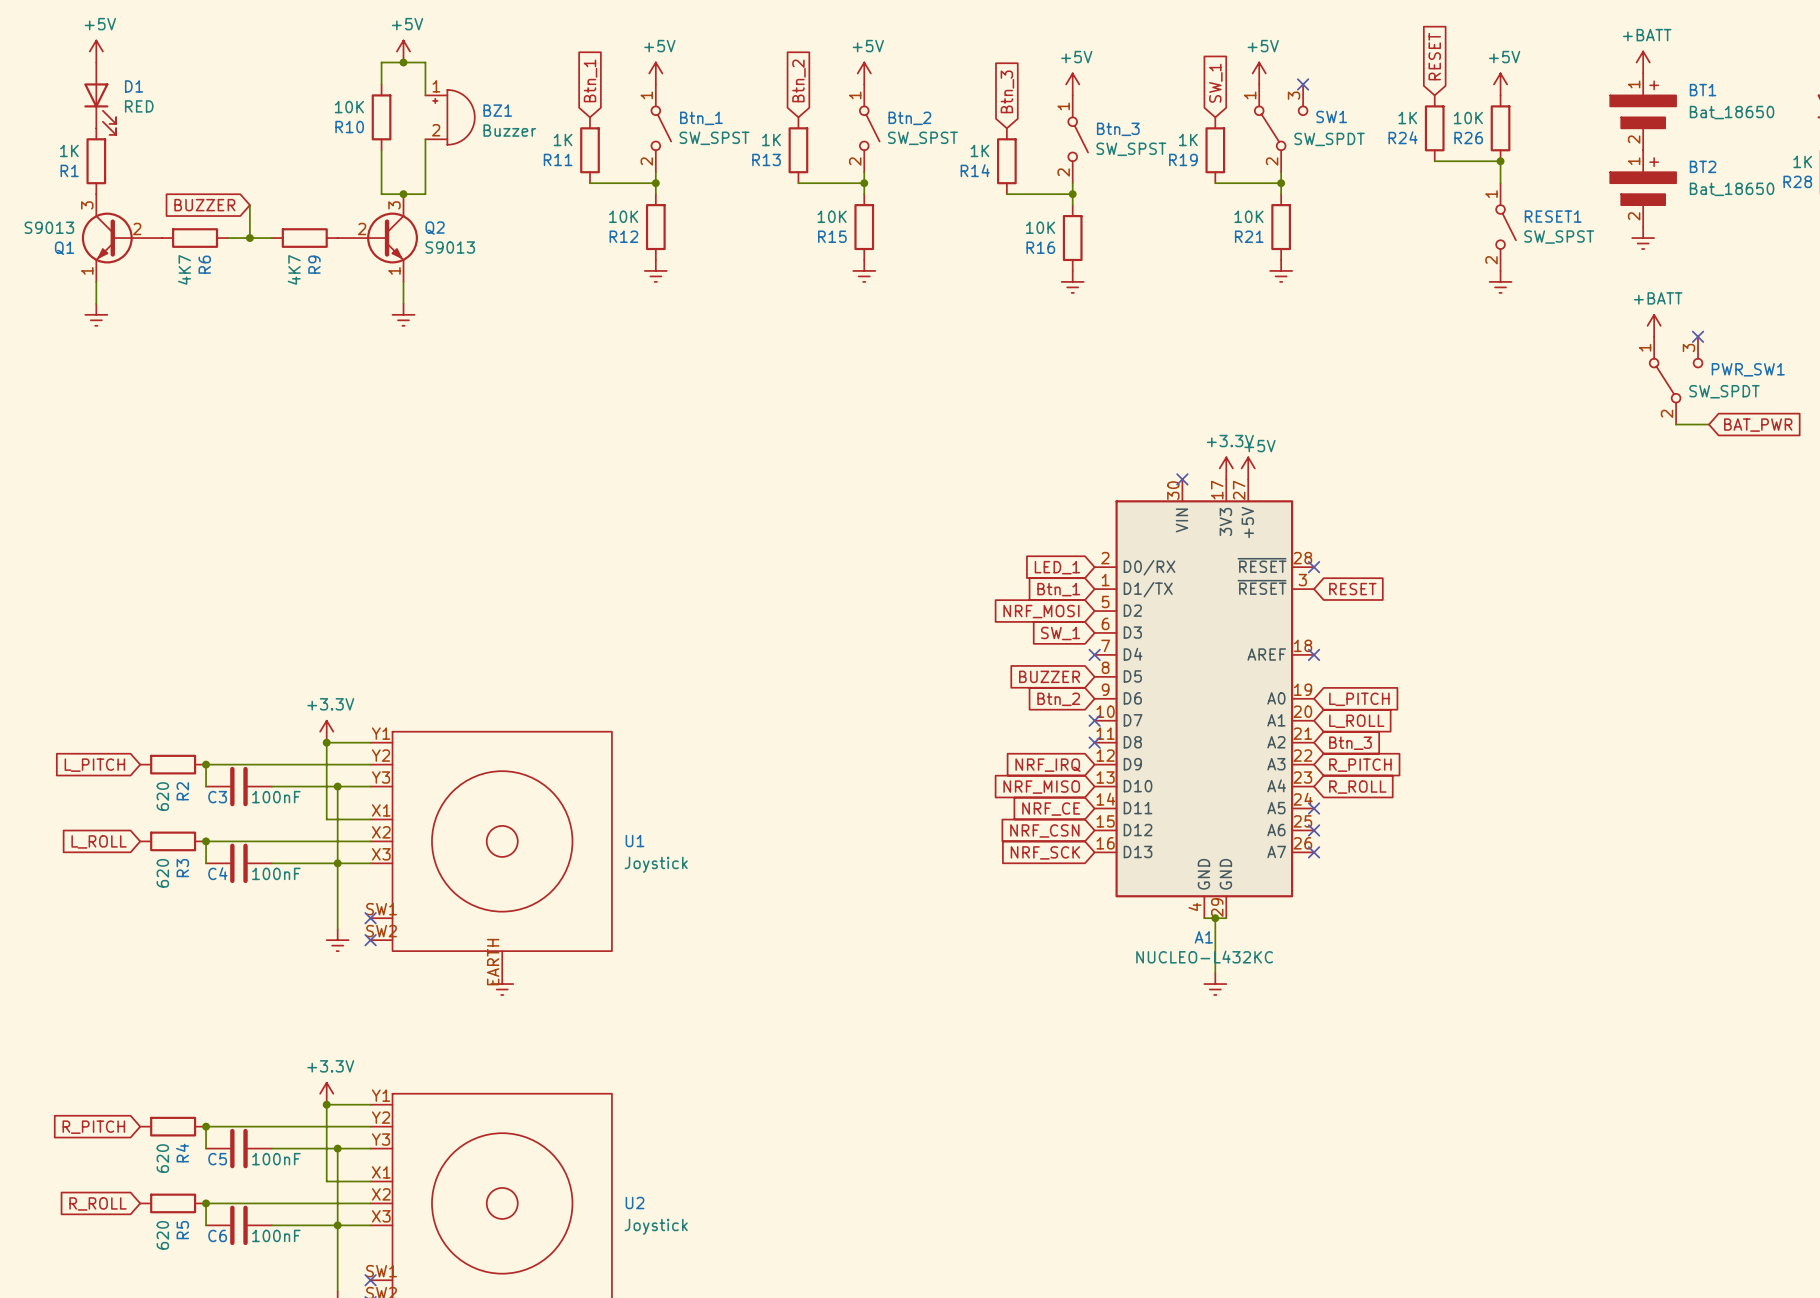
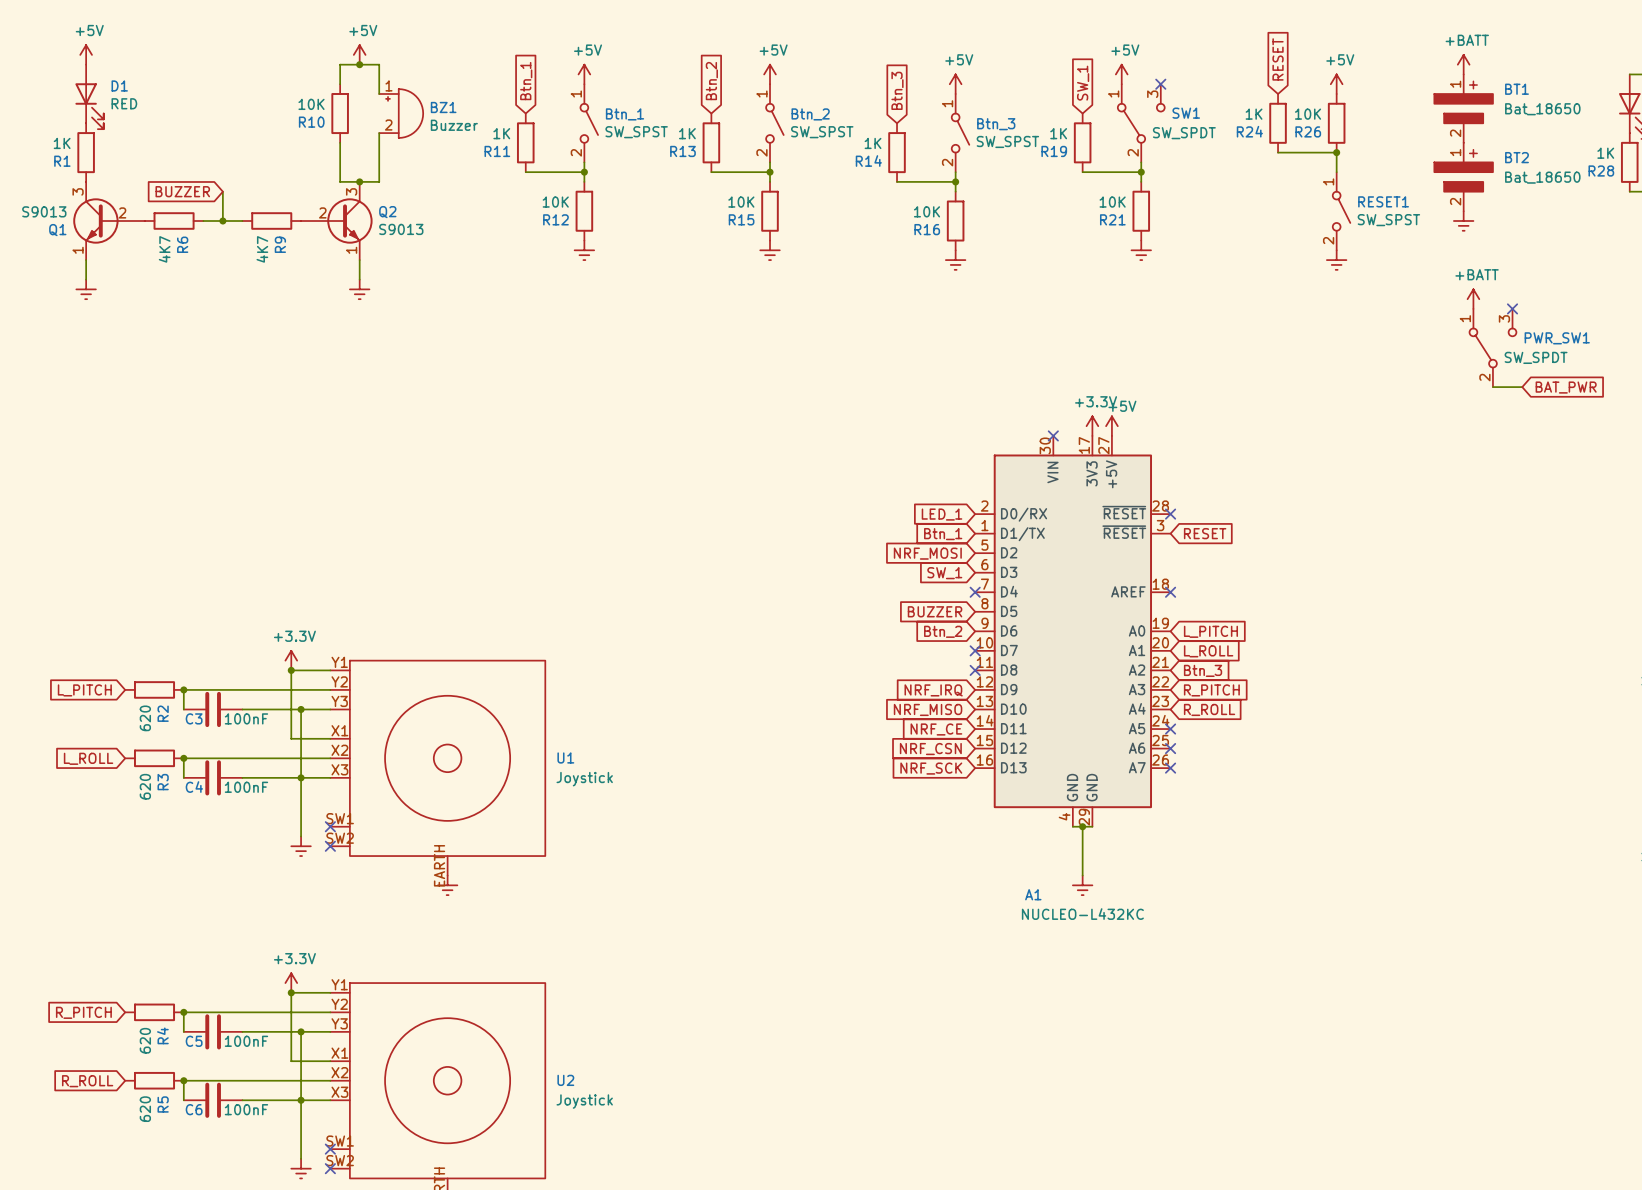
A1 name position: A1 (1203, 937) -> A1 (1033, 894)
A1 value position: NUCLEO-L432KC (1204, 957) -> NUCLEO-L432KC (1082, 914)

